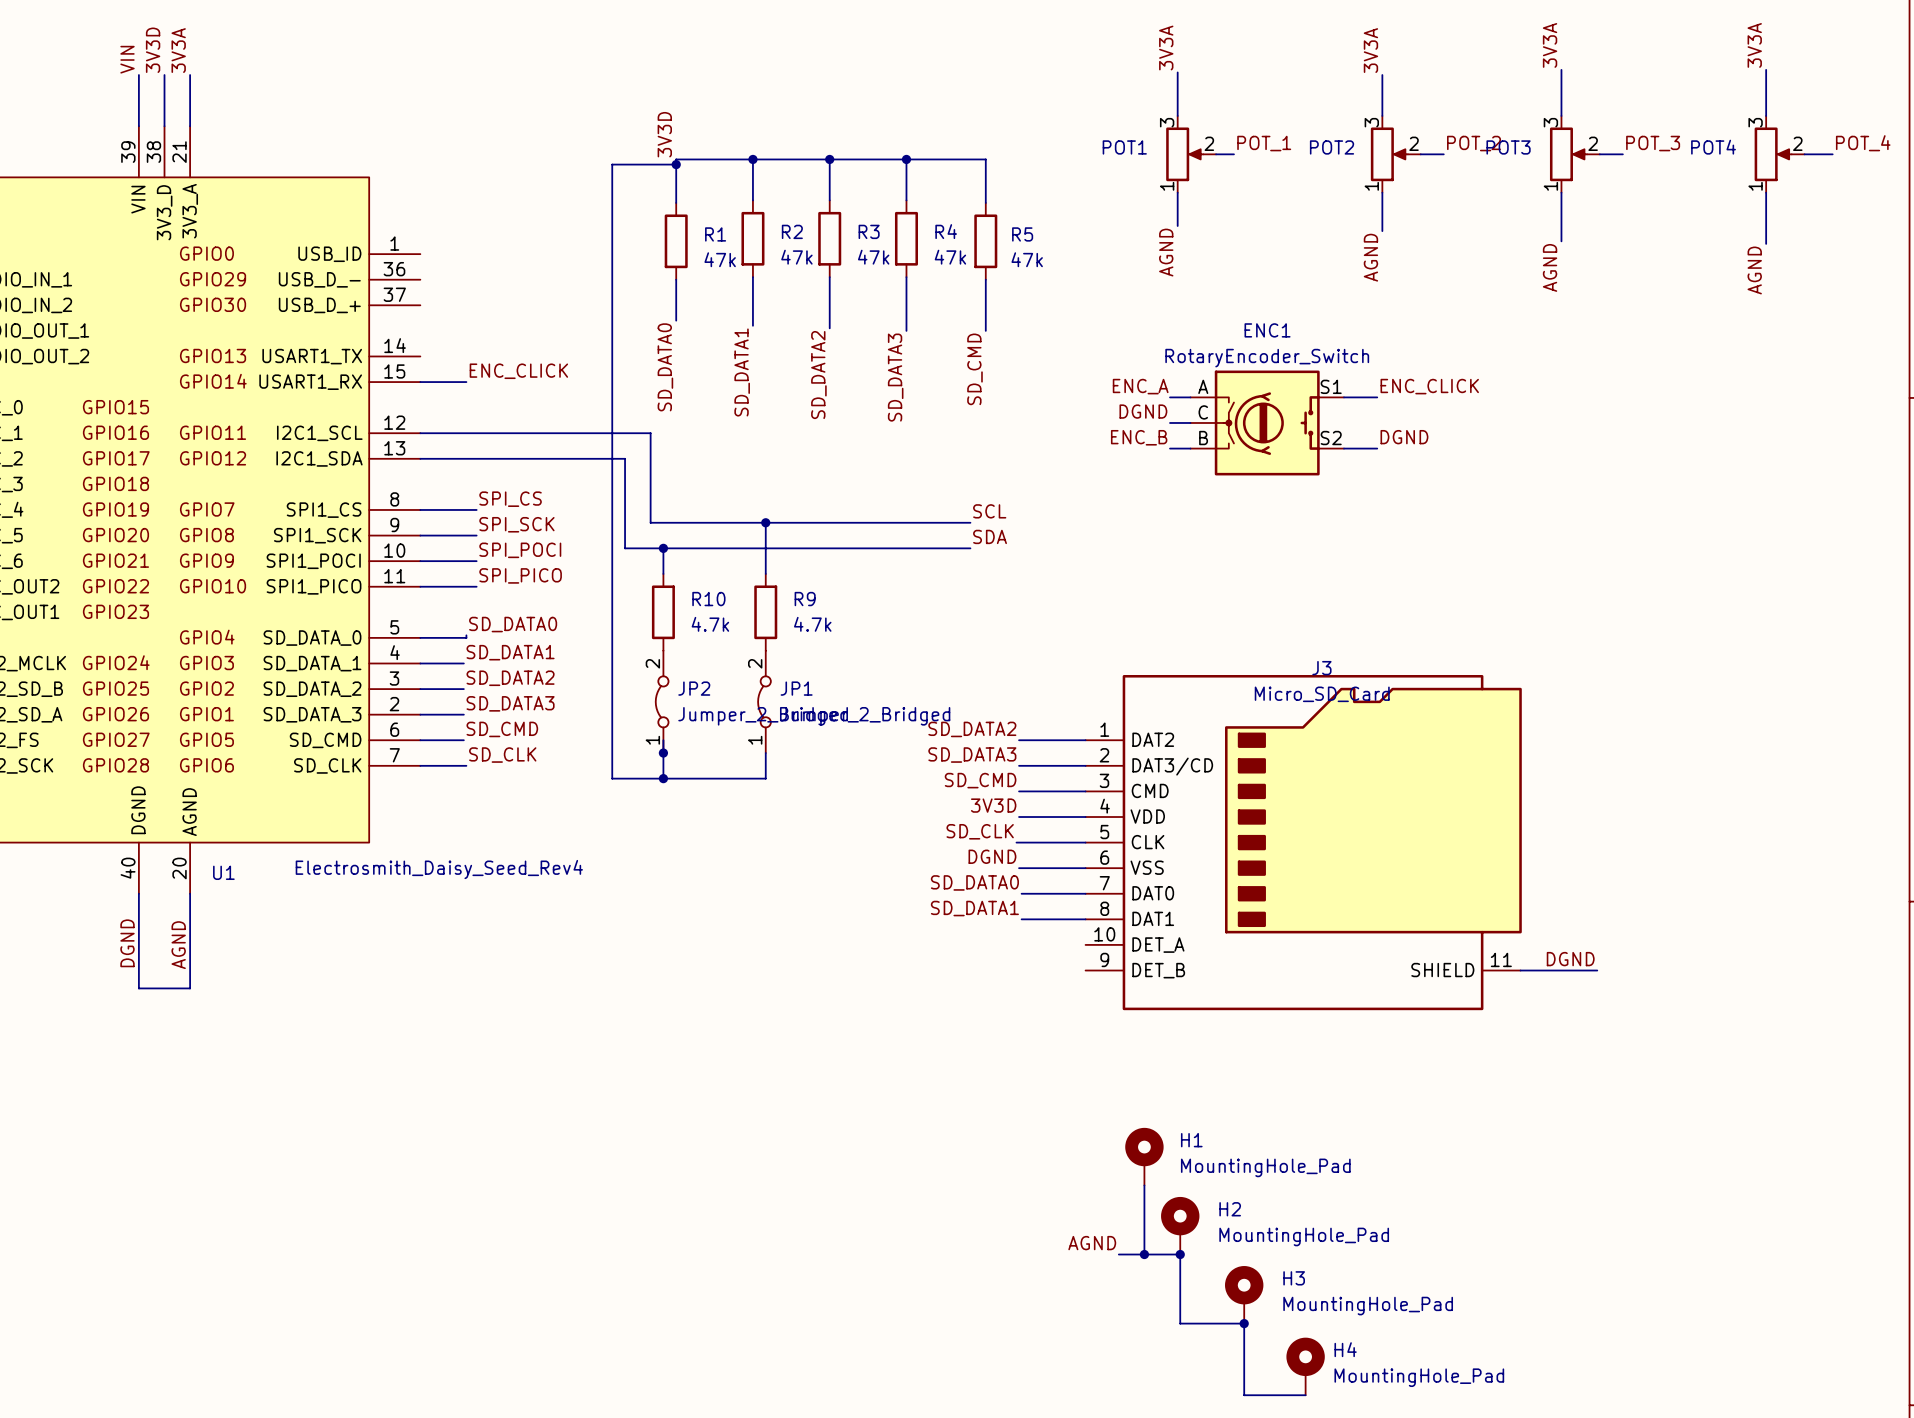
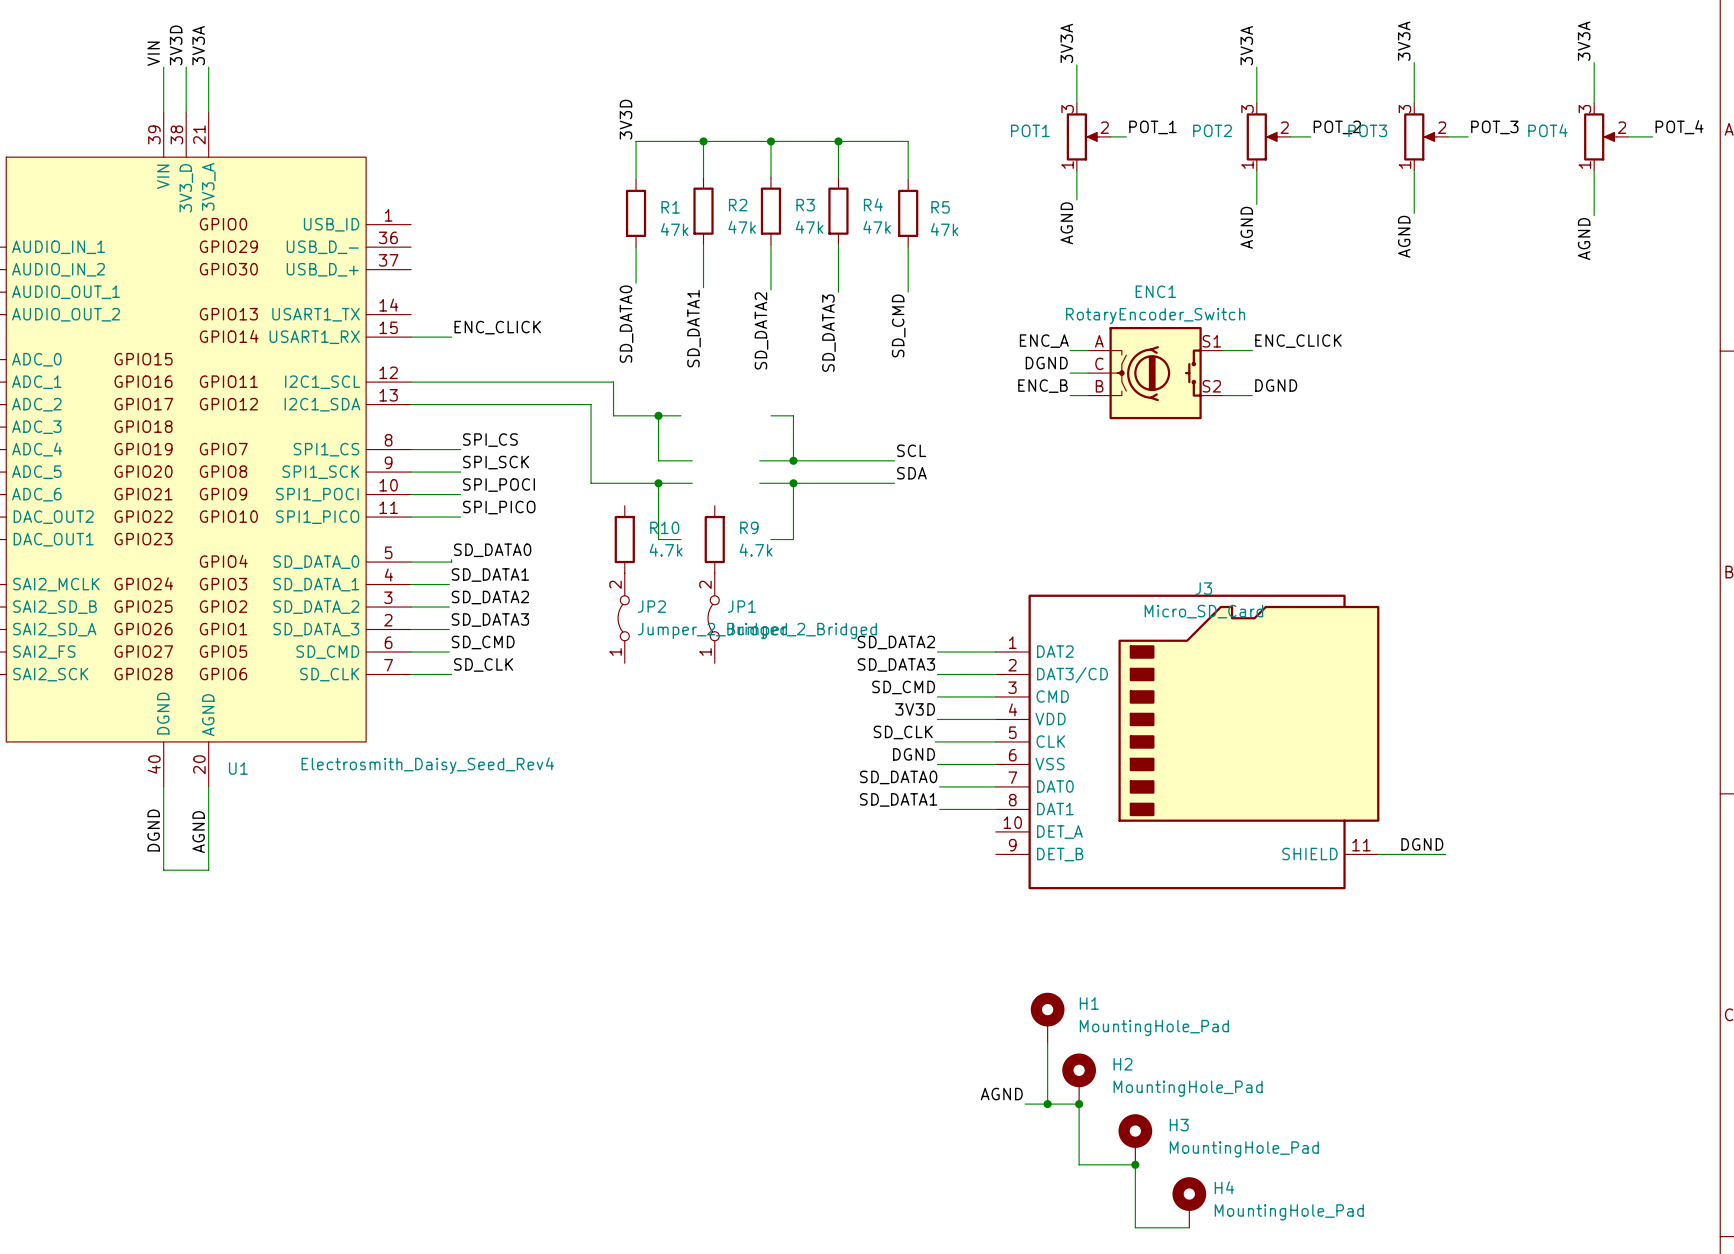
wire: (676, 164) (612, 164) (612, 778) (765, 778) (765, 753) -> none
junction: (676, 164) -> none
wire: (650, 471) (650, 522) (701, 522) -> (658, 415) (658, 460)
junction: none -> (658, 415)
wire: none -> (770, 415) (793, 415) (793, 460)
wire: (740, 522) (816, 522) -> (613, 415) (681, 415)
wire: (765, 522) (765, 573) -> none
junction: (765, 522) -> none
junction: none -> (793, 460)
wire: (663, 548) (663, 573) -> none
junction: (663, 548) -> none
wire: none -> (658, 483) (658, 539) (681, 539)
junction: none -> (658, 483)
wire: (740, 548) (816, 548) -> none
wire: none -> (793, 483) (793, 539) (770, 539)
junction: none -> (793, 483)
wire: (663, 740) (663, 778) -> none
junction: (663, 753) -> none
junction: (663, 778) -> none

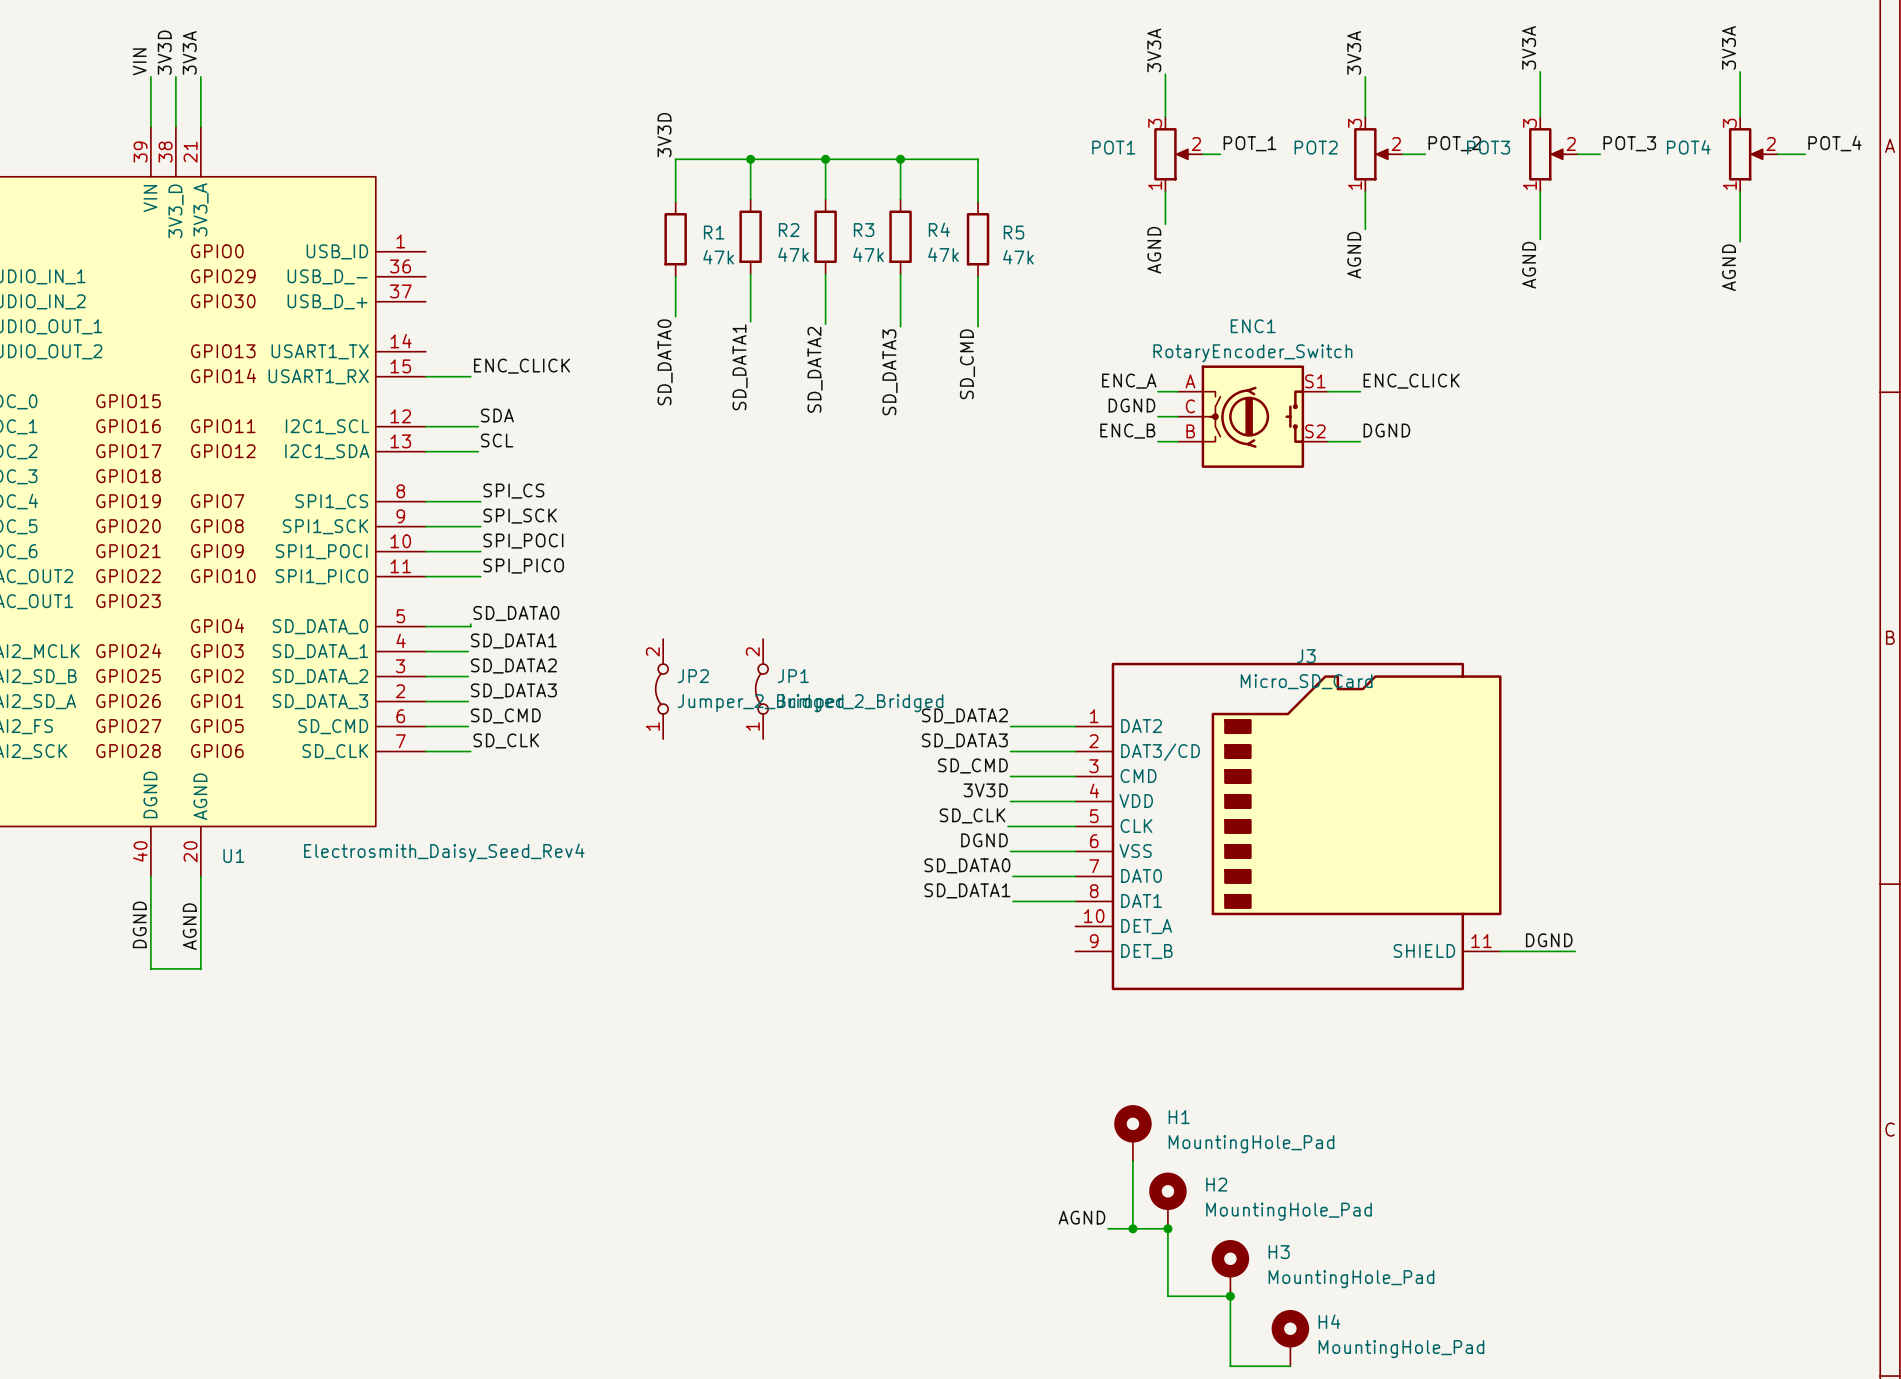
label: none -> SDA (497, 415)
wire: (458, 382) (613, 382) (613, 415) (681, 415) -> none
label: none -> SCL (497, 440)
wire: (458, 404) (591, 404) (591, 483) (692, 483) -> none
wire: (658, 415) (658, 460) (692, 460) -> none
junction: (658, 415) -> none
wire: (770, 415) (793, 415) (793, 460) -> none
label: SCL (911, 450) -> none
wire: (759, 460) (894, 460) -> none
junction: (793, 460) -> none
label: SDA (911, 473) -> none
wire: (658, 483) (658, 539) (681, 539) -> none
junction: (658, 483) -> none
wire: (759, 483) (894, 483) -> none
wire: (793, 483) (793, 539) (770, 539) -> none
junction: (793, 483) -> none
R10: 4.7k (624, 539) -> none
R9: 4.7k (714, 539) -> none

